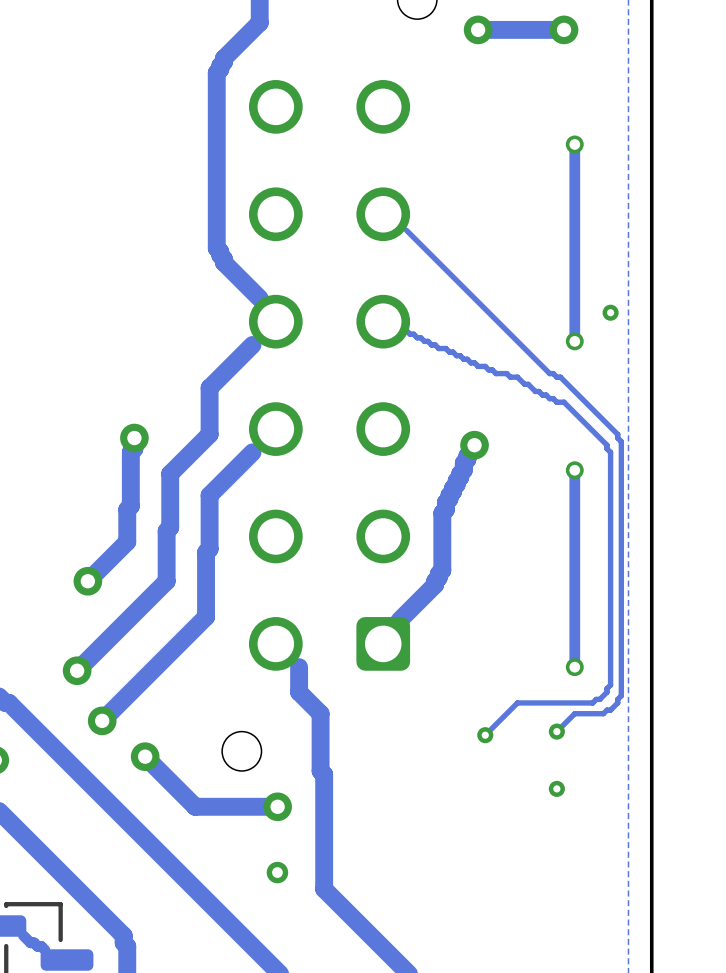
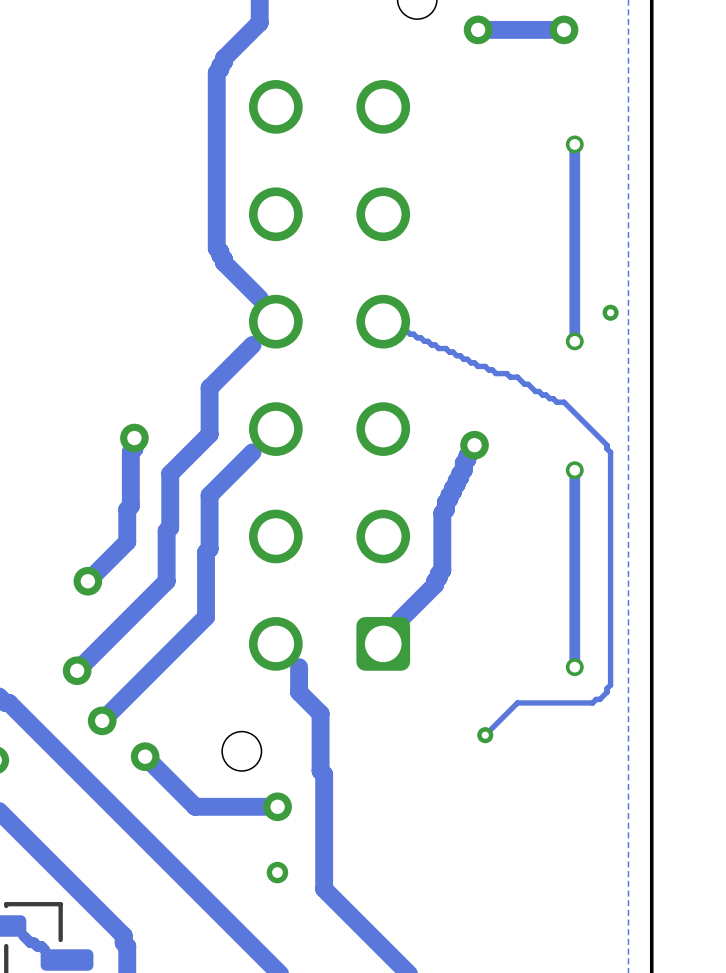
track: (406, 230) (549, 373) (560, 377) (617, 434) (617, 438) (621, 441) (621, 695) (610, 710) (607, 710) (603, 713) (574, 713) (556, 731) -> none
via: (556, 731) -> none
via: (556, 788) -> none

